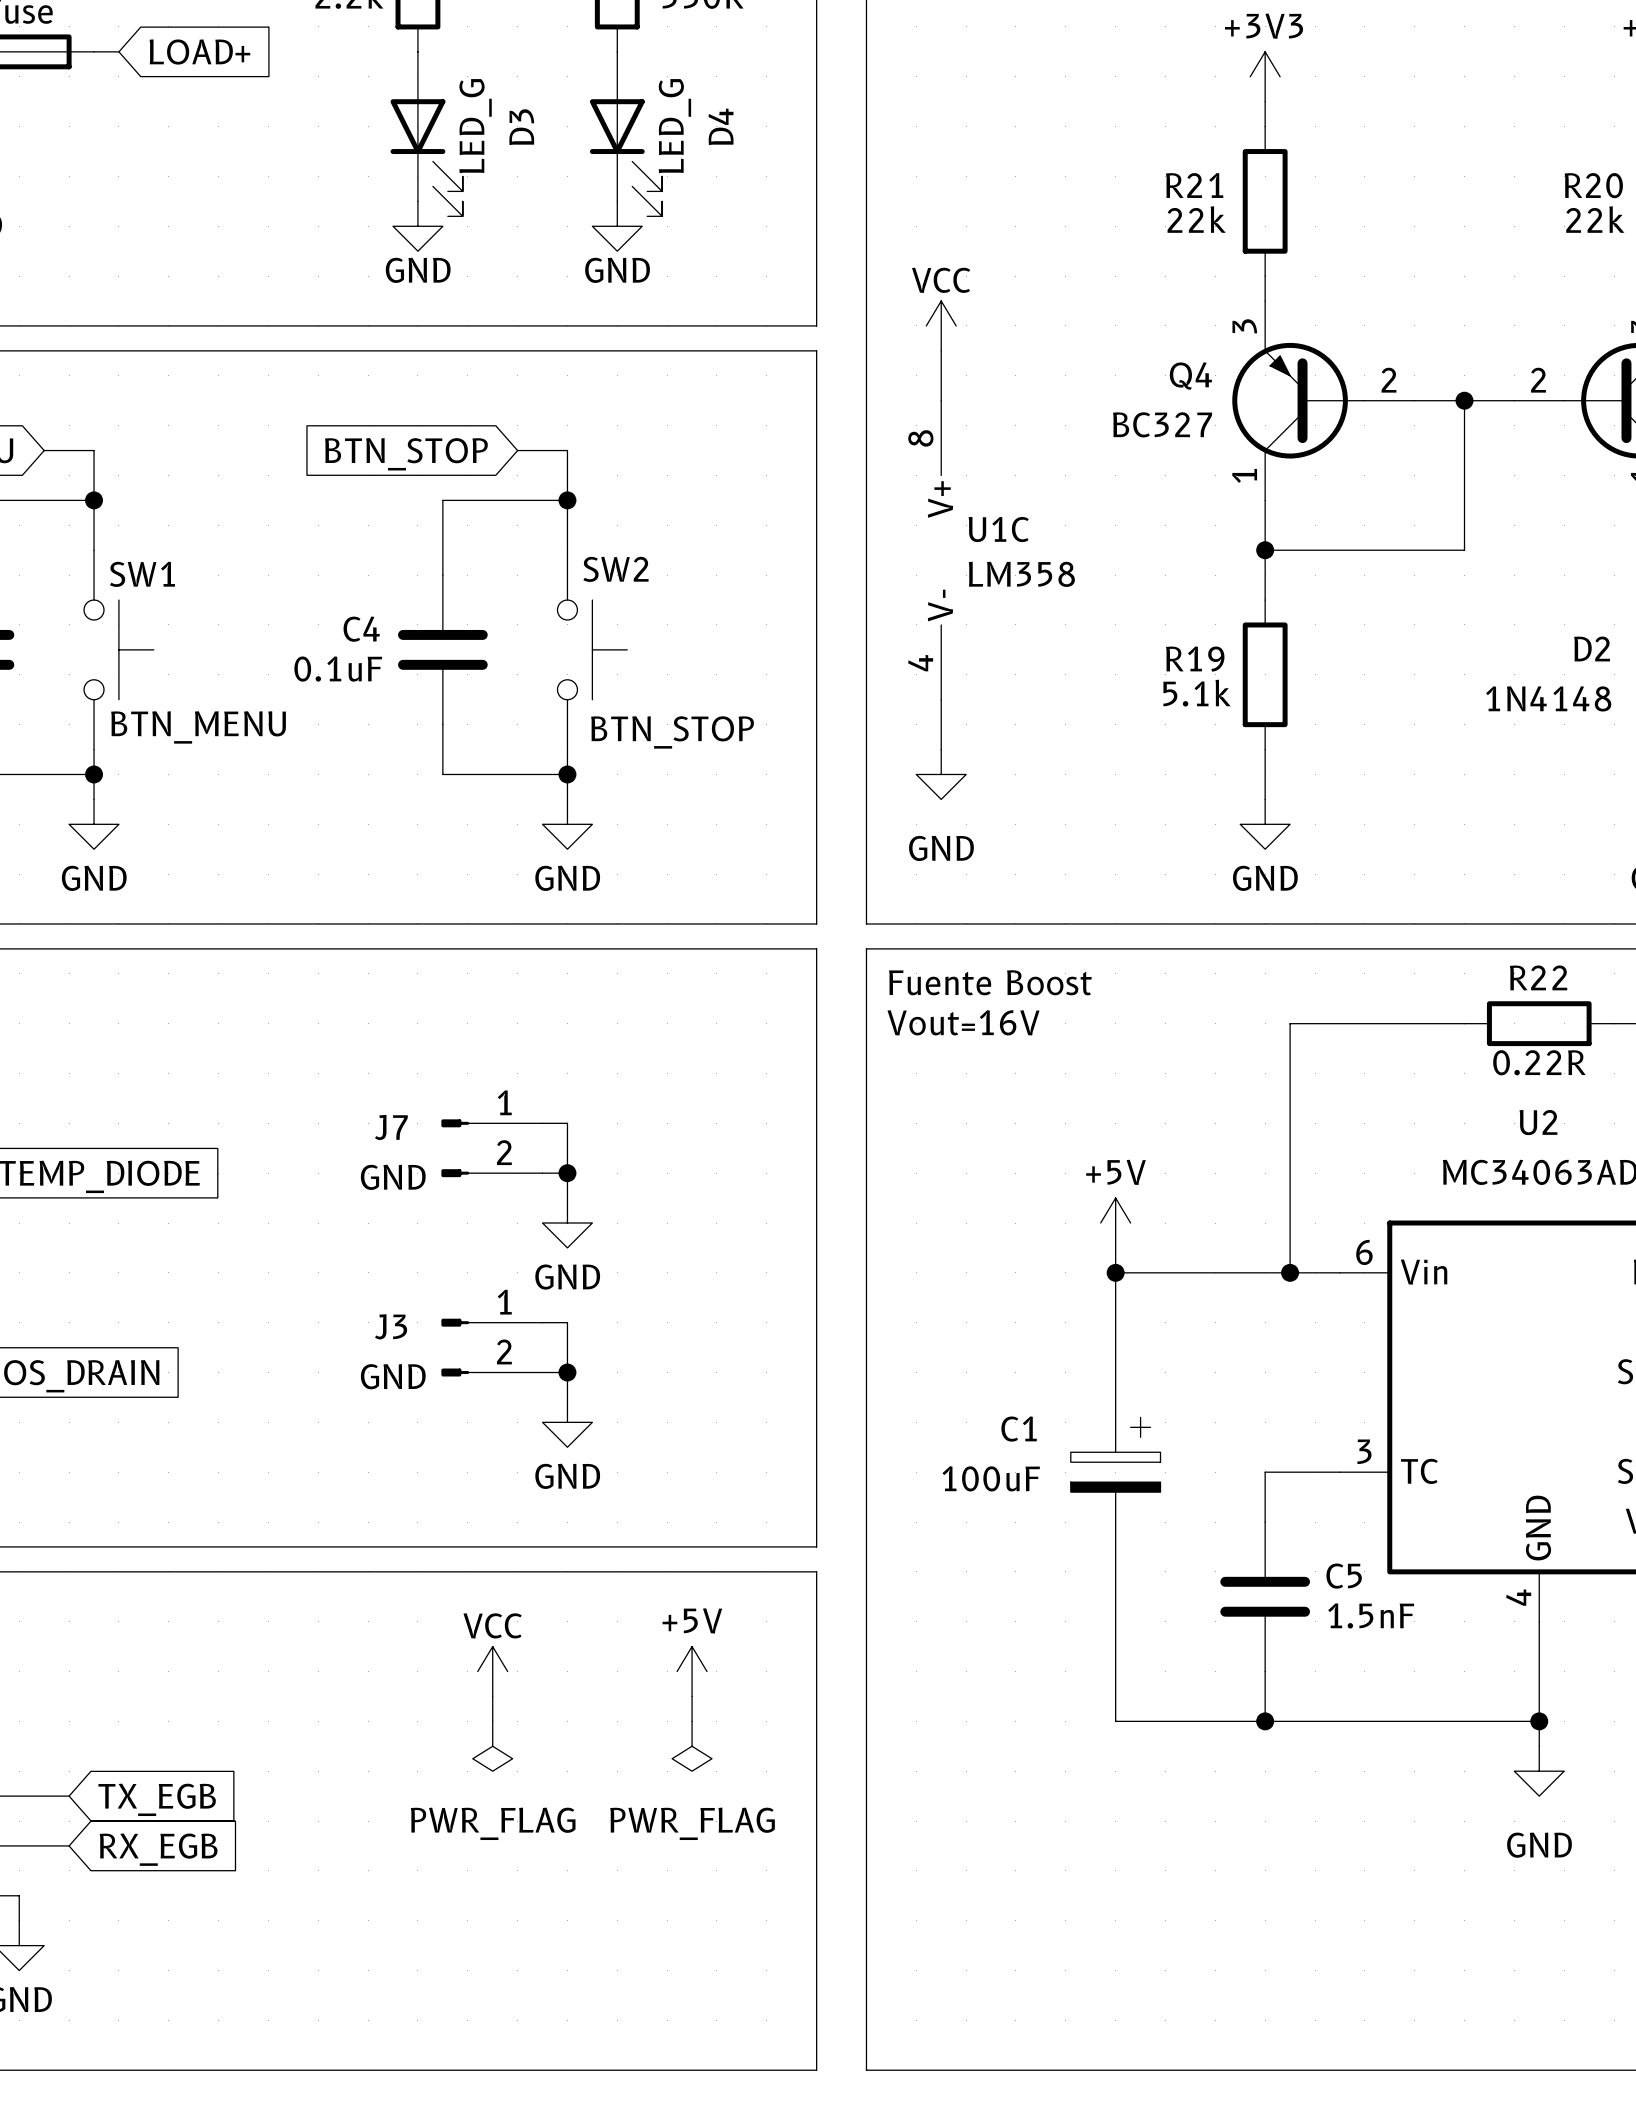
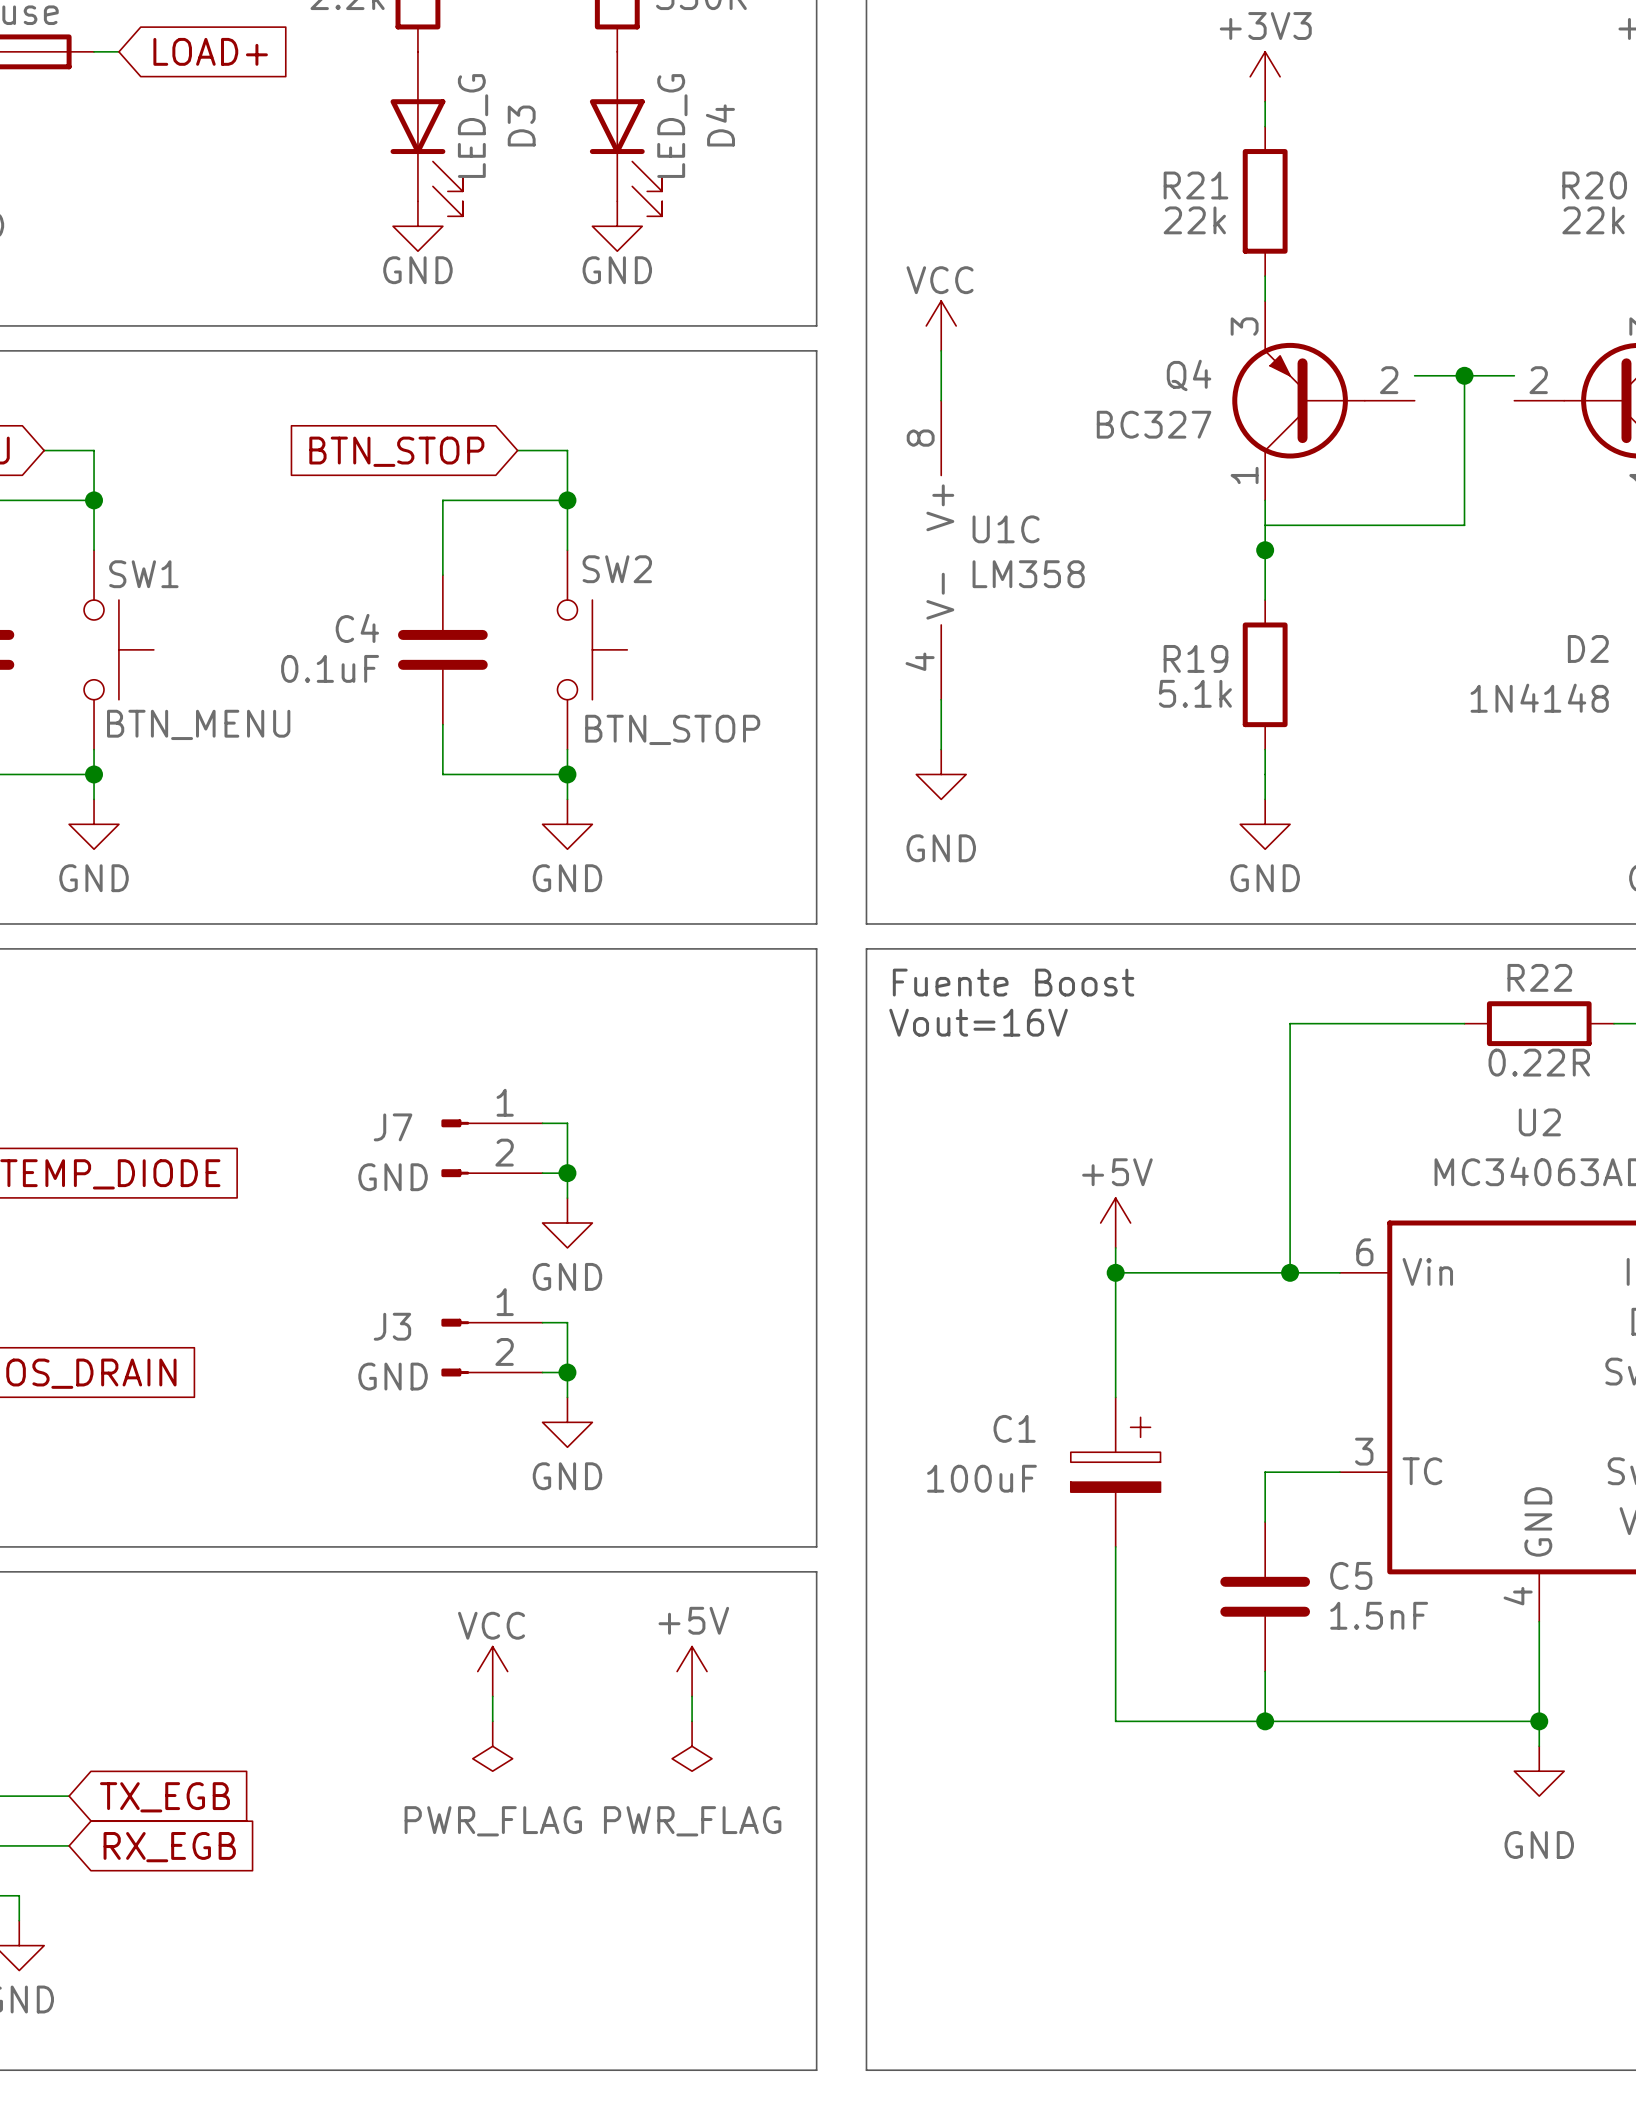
wire: none -> (1464, 375) (1464, 400)
wire: (1414, 400) (1514, 400) -> (1414, 375) (1514, 375)
junction position: (1464, 400) -> (1464, 375)
wire: (1464, 525) (1464, 550) (1265, 550) -> (1464, 525) (1265, 525)

